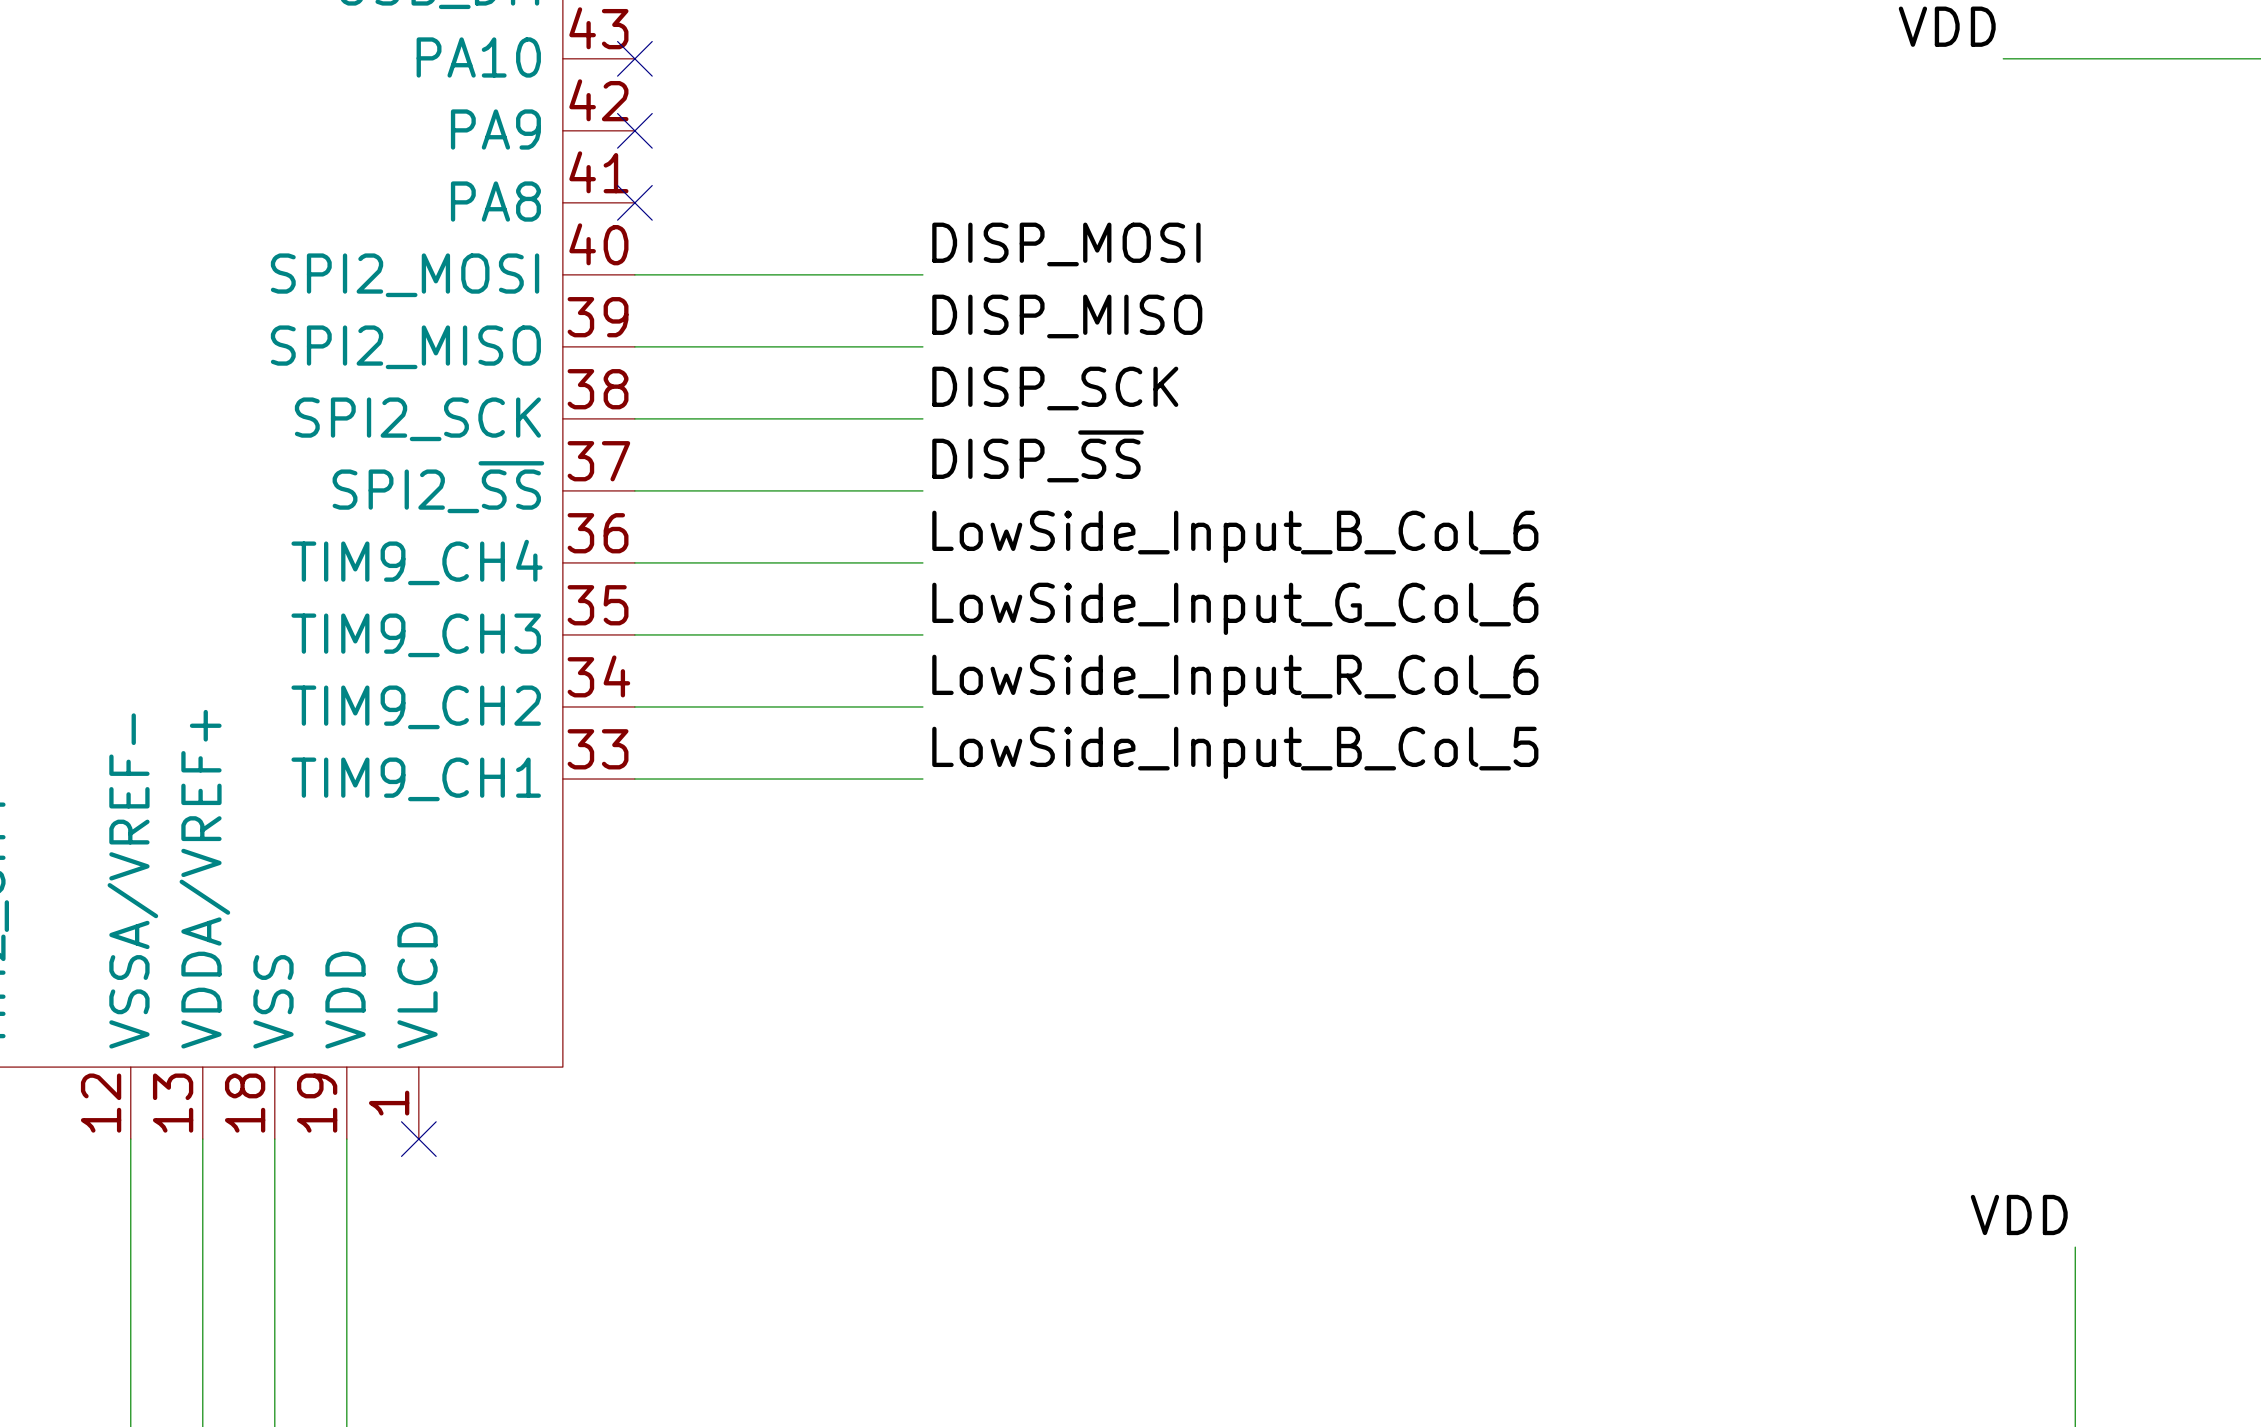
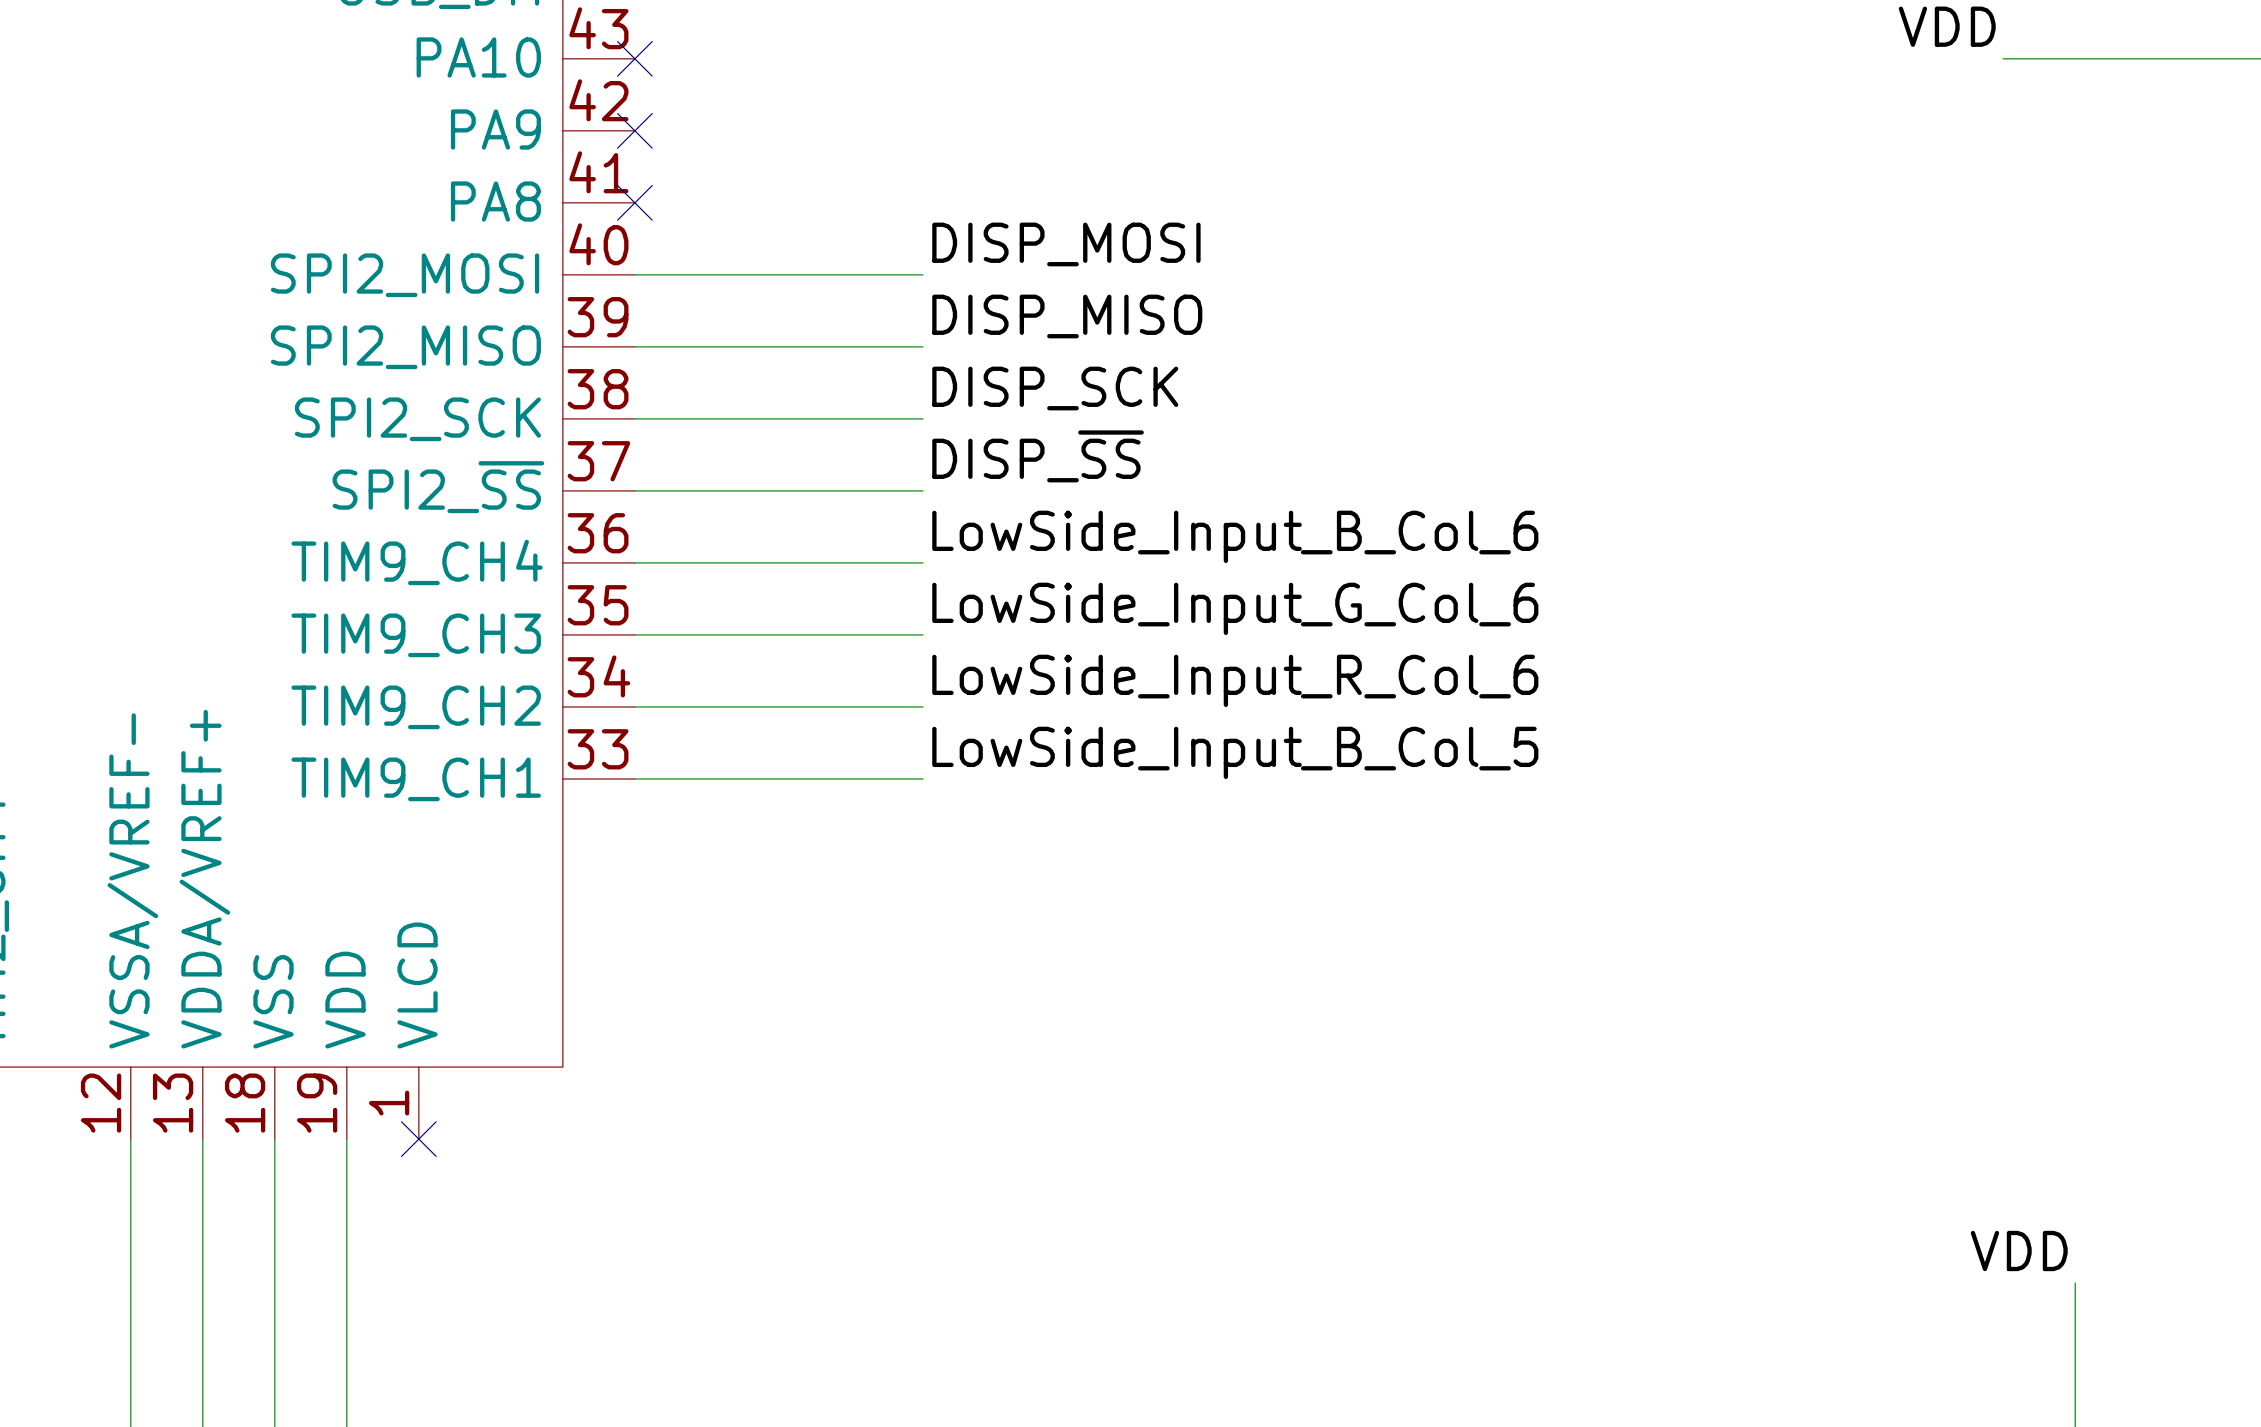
label position: VDD (2019, 1214) -> VDD (2019, 1250)
wire: (2075, 1247) (2075, 1283) -> none

